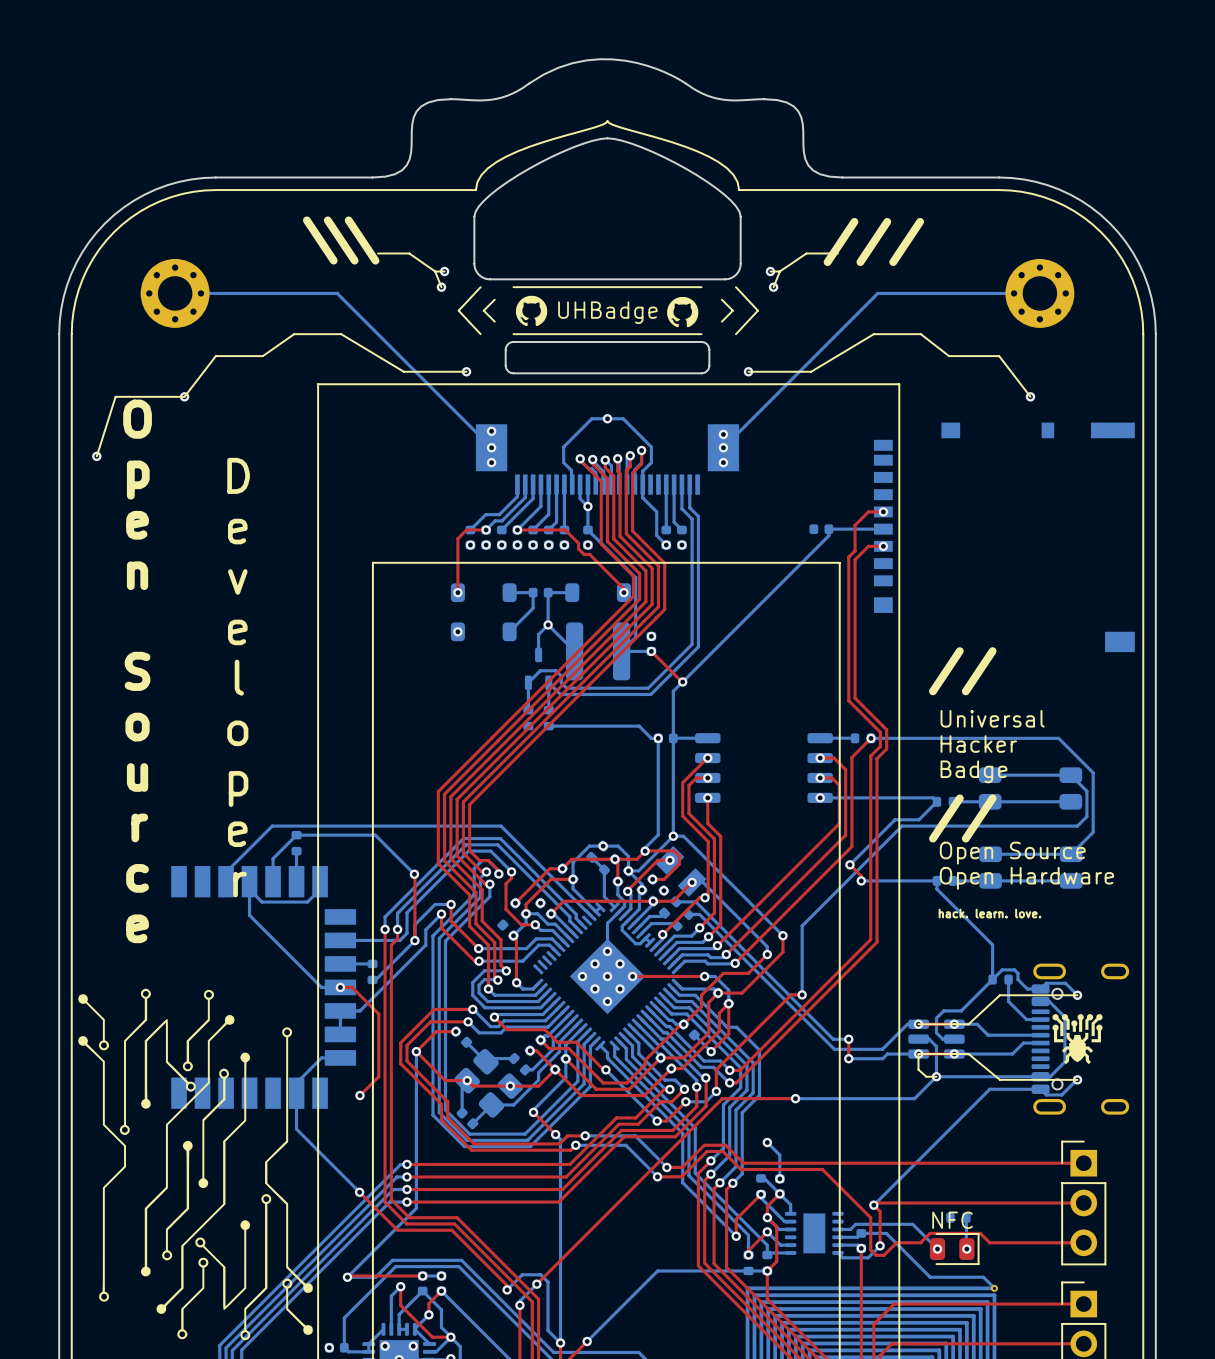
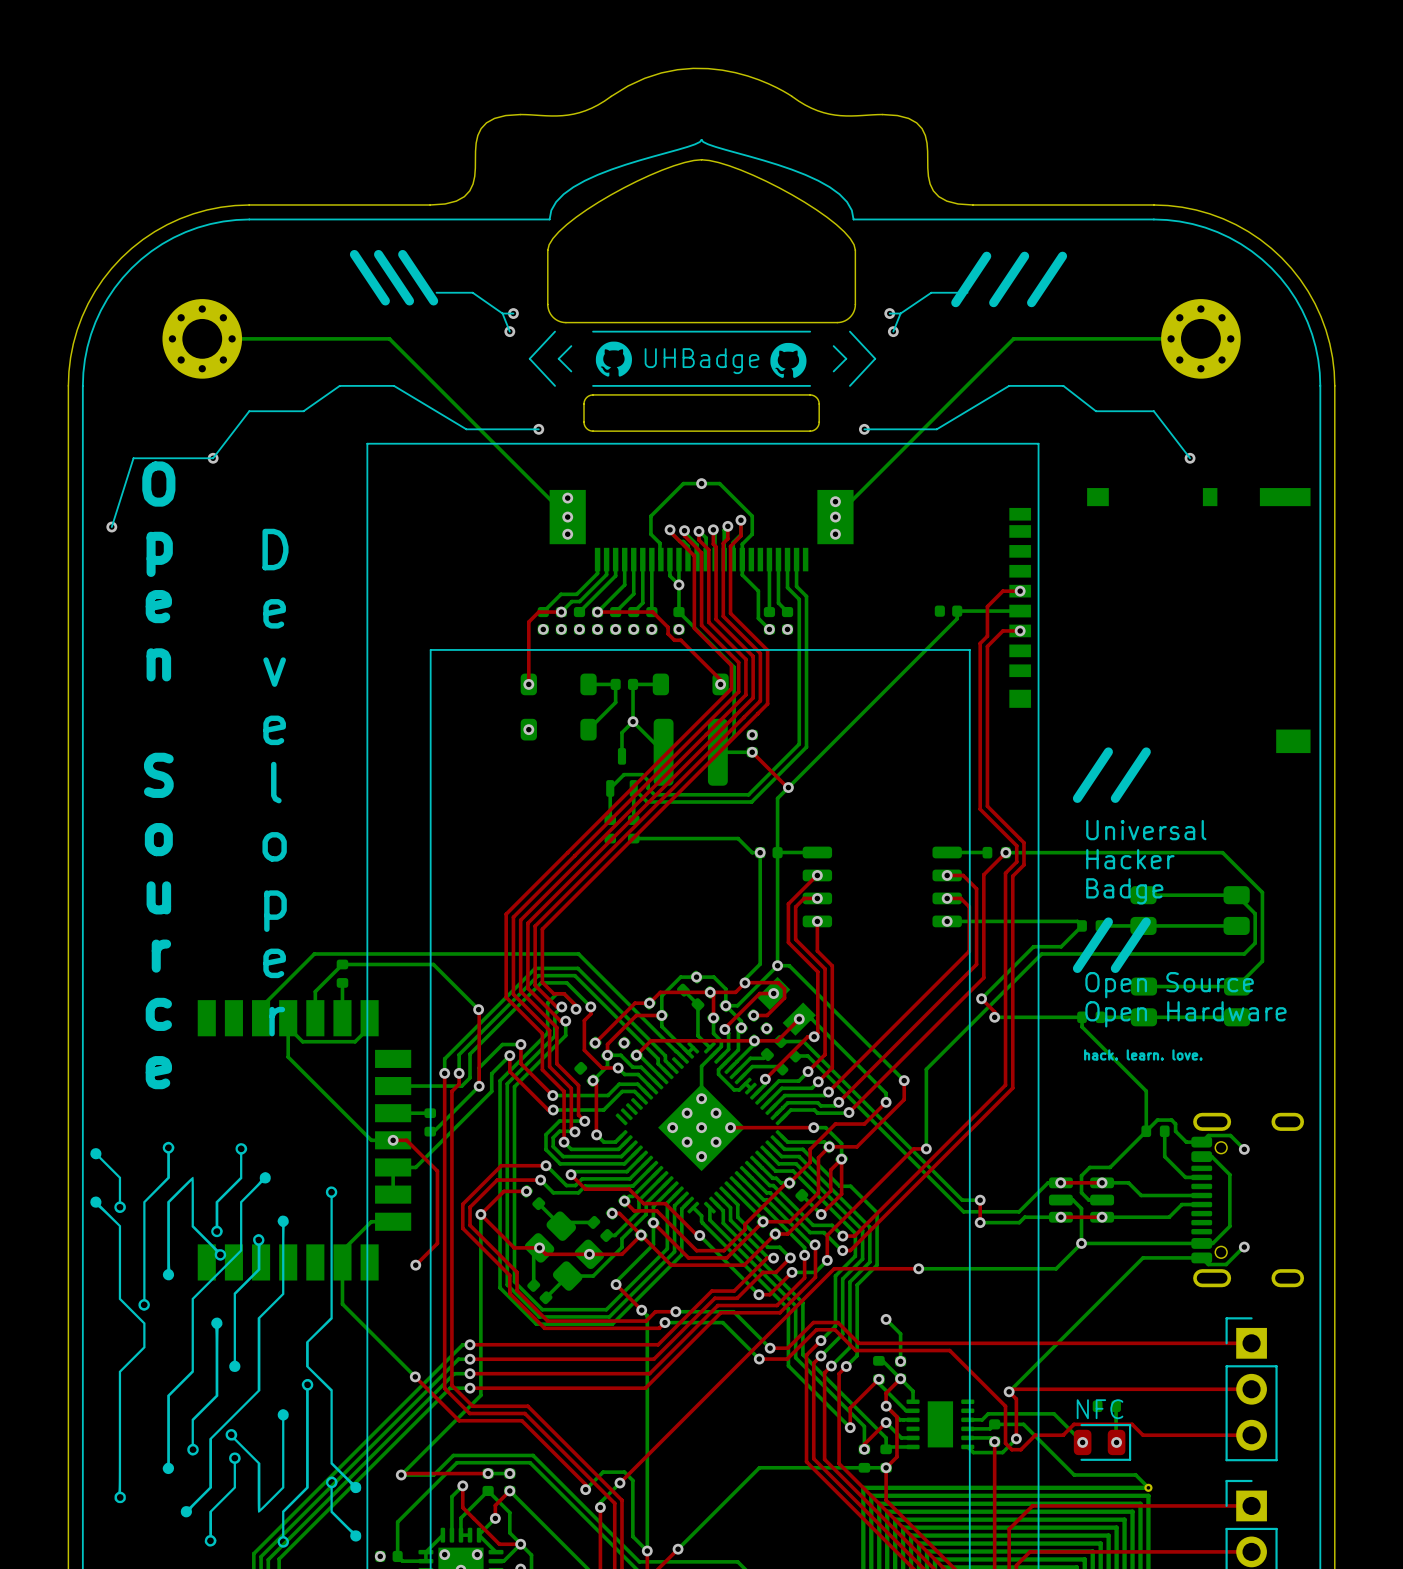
line: (1077, 995) (999, 995) (968, 1024) (918, 1024) -> none
drawing: [1052, 1014, 1103, 1065] -> none
line: (936, 1076) (926, 1076) (918, 1069) (918, 1054) (968, 1054) (999, 1079) (1077, 1079) -> none

